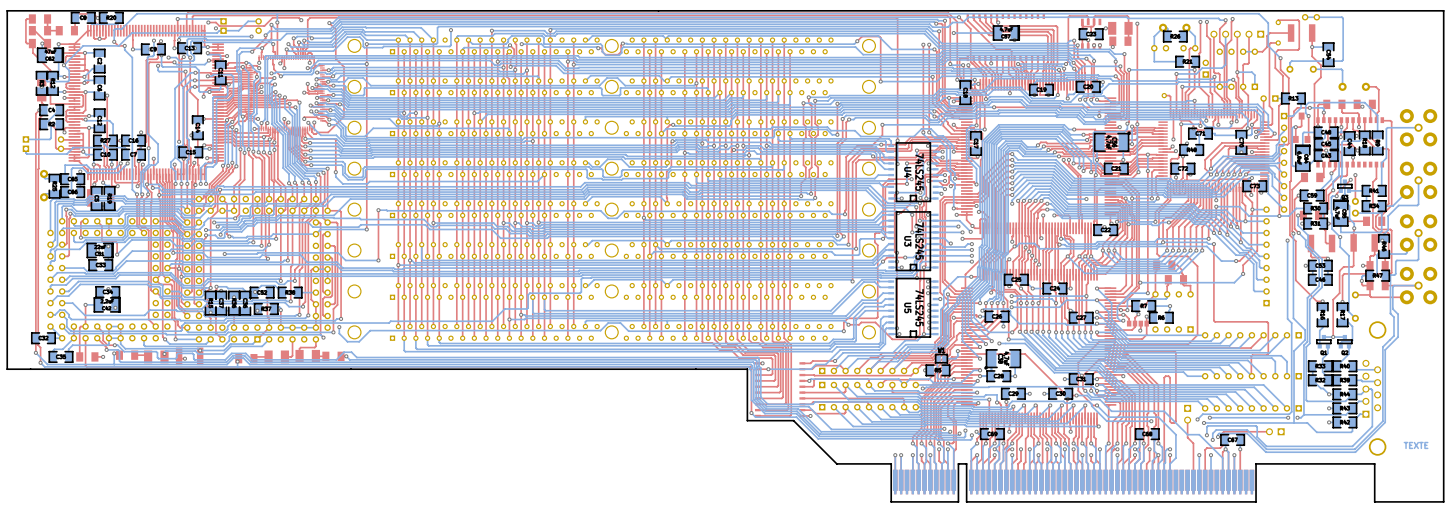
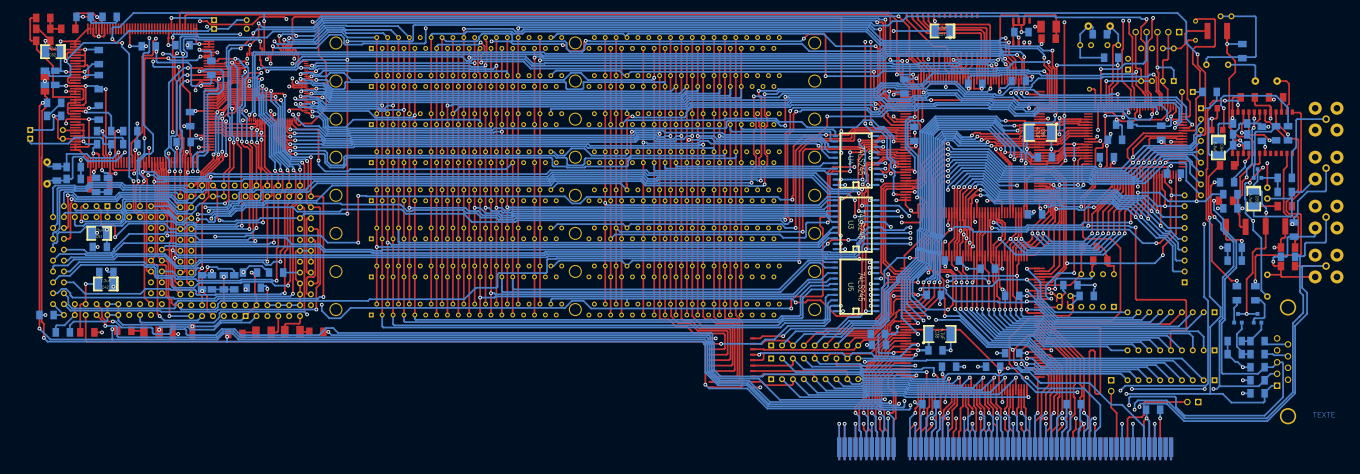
board edge: (1443, 10) (7, 10) (7, 369) (747, 369) (747, 420) (793, 420) (836, 463) (891, 463) (891, 501) (958, 501) (958, 463) (966, 463) (966, 501) (1256, 501) (1256, 463) (1374, 463) (1374, 501) (1443, 501) (1443, 10) -> none
part: (83, 17) -> none
part: none -> (83, 16)
part: (111, 17) -> none
part: none -> (109, 16)
part: (1091, 34) -> none
part: none -> (1021, 32)
part: (1175, 36) -> none
part: none -> (1099, 34)
part: (189, 48) -> none
part: none -> (182, 45)
part: (153, 49) -> none
part: none -> (148, 46)
part: (1328, 54) -> none
part: none -> (1242, 51)
part: (99, 61) -> none
part: none -> (98, 57)
part: (1187, 61) -> none
part: none -> (1111, 57)
part: (220, 72) -> none
part: none -> (211, 67)
part: (41, 83) -> none
part: none -> (44, 77)
part: (52, 83) -> none
part: none -> (55, 77)
part: (1088, 86) -> none
part: none -> (1018, 81)
part: (99, 87) -> none
part: none -> (98, 82)
part: (1041, 89) -> none
part: none -> (975, 83)
part: (965, 92) -> none
part: none -> (904, 86)
part: (1293, 98) -> none
part: none -> (1209, 91)
part: (51, 110) -> none
part: none -> (54, 102)
part: (99, 120) -> none
part: none -> (98, 112)
part: (51, 124) -> none
part: none -> (54, 115)
part: (197, 127) -> none
part: none -> (190, 119)
part: (1326, 132) -> none
part: none -> (1240, 123)
part: (1200, 133) -> none
part: none -> (1123, 124)
part: (105, 140) -> none
part: none -> (104, 131)
part: (133, 140) -> none
part: none -> (130, 131)
part: (1241, 142) -> none
part: none -> (1161, 132)
part: (1364, 142) -> none
part: none -> (1276, 133)
part: (1377, 142) -> none
part: none -> (1288, 133)
part: (975, 143) -> none
part: none -> (914, 133)
part: (1349, 143) -> none
part: none -> (1261, 133)
part: (1326, 144) -> none
part: none -> (1240, 134)
part: (1191, 149) -> none
part: none -> (1115, 139)
part: (190, 152) -> none
part: none -> (183, 141)
part: (105, 154) -> none
part: none -> (104, 144)
part: (133, 154) -> none
part: none -> (130, 144)
part: (1326, 155) -> none
part: none -> (1240, 145)
part: (1116, 168) -> none
part: none -> (1044, 157)
part: (1182, 168) -> none
part: none -> (1106, 157)
part: (72, 179) -> none
part: none -> (73, 167)
part: (54, 186) -> none
part: none -> (56, 173)
part: (1254, 186) -> none
part: none -> (1173, 173)
part: (1344, 186) -> none
part: none -> (1257, 173)
part: (1374, 190) -> none
part: none -> (1284, 177)
part: (72, 192) -> none
part: none -> (73, 178)
part: (1312, 195) -> none
part: none -> (1227, 182)
part: (96, 198) -> none
part: none -> (96, 184)
part: (109, 198) -> none
part: none -> (107, 184)
part: (1374, 206) -> none
part: none -> (1284, 192)
part: (1315, 208) -> none
part: none -> (1230, 194)
part: (1315, 223) -> none
part: none -> (1230, 208)
part: (1105, 230) -> none
part: none -> (1035, 214)
part: (1384, 246) -> none
part: none -> (1294, 229)
part: none -> (99, 233)
part: (100, 265) -> none
part: none -> (99, 246)
part: (1320, 265) -> none
part: none -> (1234, 247)
part: (1377, 275) -> none
part: none -> (1288, 256)
part: (1016, 279) -> none
part: none -> (951, 260)
part: (1320, 279) -> none
part: none -> (1234, 260)
part: (1054, 288) -> none
part: none -> (987, 268)
part: (107, 292) -> none
part: none -> (106, 272)
part: (262, 292) -> none
part: none -> (249, 272)
part: (290, 292) -> none
part: none -> (276, 272)
part: (210, 303) -> none
part: none -> (202, 282)
part: (221, 303) -> none
part: none -> (211, 282)
part: (234, 303) -> none
part: none -> (223, 282)
part: (245, 303) -> none
part: none -> (234, 282)
part: none -> (105, 283)
part: (1143, 306) -> none
part: none -> (1070, 285)
part: (266, 308) -> none
part: none -> (253, 287)
via: (1138, 314) -> none
part: (1322, 314) -> none
part: none -> (1236, 293)
part: (1342, 314) -> none
part: none -> (1255, 293)
part: (997, 316) -> none
part: none -> (933, 294)
via: (1146, 316) -> none
part: (1081, 317) -> none
part: none -> (1012, 295)
part: (1161, 317) -> none
part: none -> (1086, 295)
bottom track: none -> (1079, 296) (1070, 306)
part footprint: [1126, 320, 1138, 327] -> [1056, 292, 1063, 310]
part footprint: [1138, 320, 1149, 327] -> [1067, 292, 1074, 310]
via: (1140, 330) -> none
part: (43, 338) -> none
part: none -> (46, 314)
part: (1323, 341) -> none
part: none -> (1237, 318)
part: (1344, 341) -> none
part: none -> (1257, 318)
part: (61, 356) -> none
part: none -> (62, 332)
part: none -> (877, 334)
part: (941, 358) -> none
part: (1320, 366) -> none
part: none -> (1234, 341)
part: (1344, 366) -> none
part: none -> (1257, 341)
part: (937, 370) -> none
part: none -> (878, 344)
part: (998, 376) -> none
part: none -> (935, 350)
part: (1081, 379) -> none
part: none -> (1012, 353)
part: (1320, 380) -> none
part: none -> (1234, 354)
part: (1344, 380) -> none
part: none -> (1257, 354)
part: (1013, 393) -> none
part: none -> (949, 366)
part: (1060, 393) -> none
part: none -> (993, 366)
part: (1344, 394) -> none
part: none -> (1257, 367)
part: (1344, 408) -> none
part: none -> (1257, 380)
part: (1344, 422) -> none
part: none -> (1257, 393)
part: (992, 434) -> none
part: none -> (929, 404)
part: (1147, 434) -> none
part: none -> (1073, 404)
part: (1232, 439) -> none
part: none -> (1153, 409)

